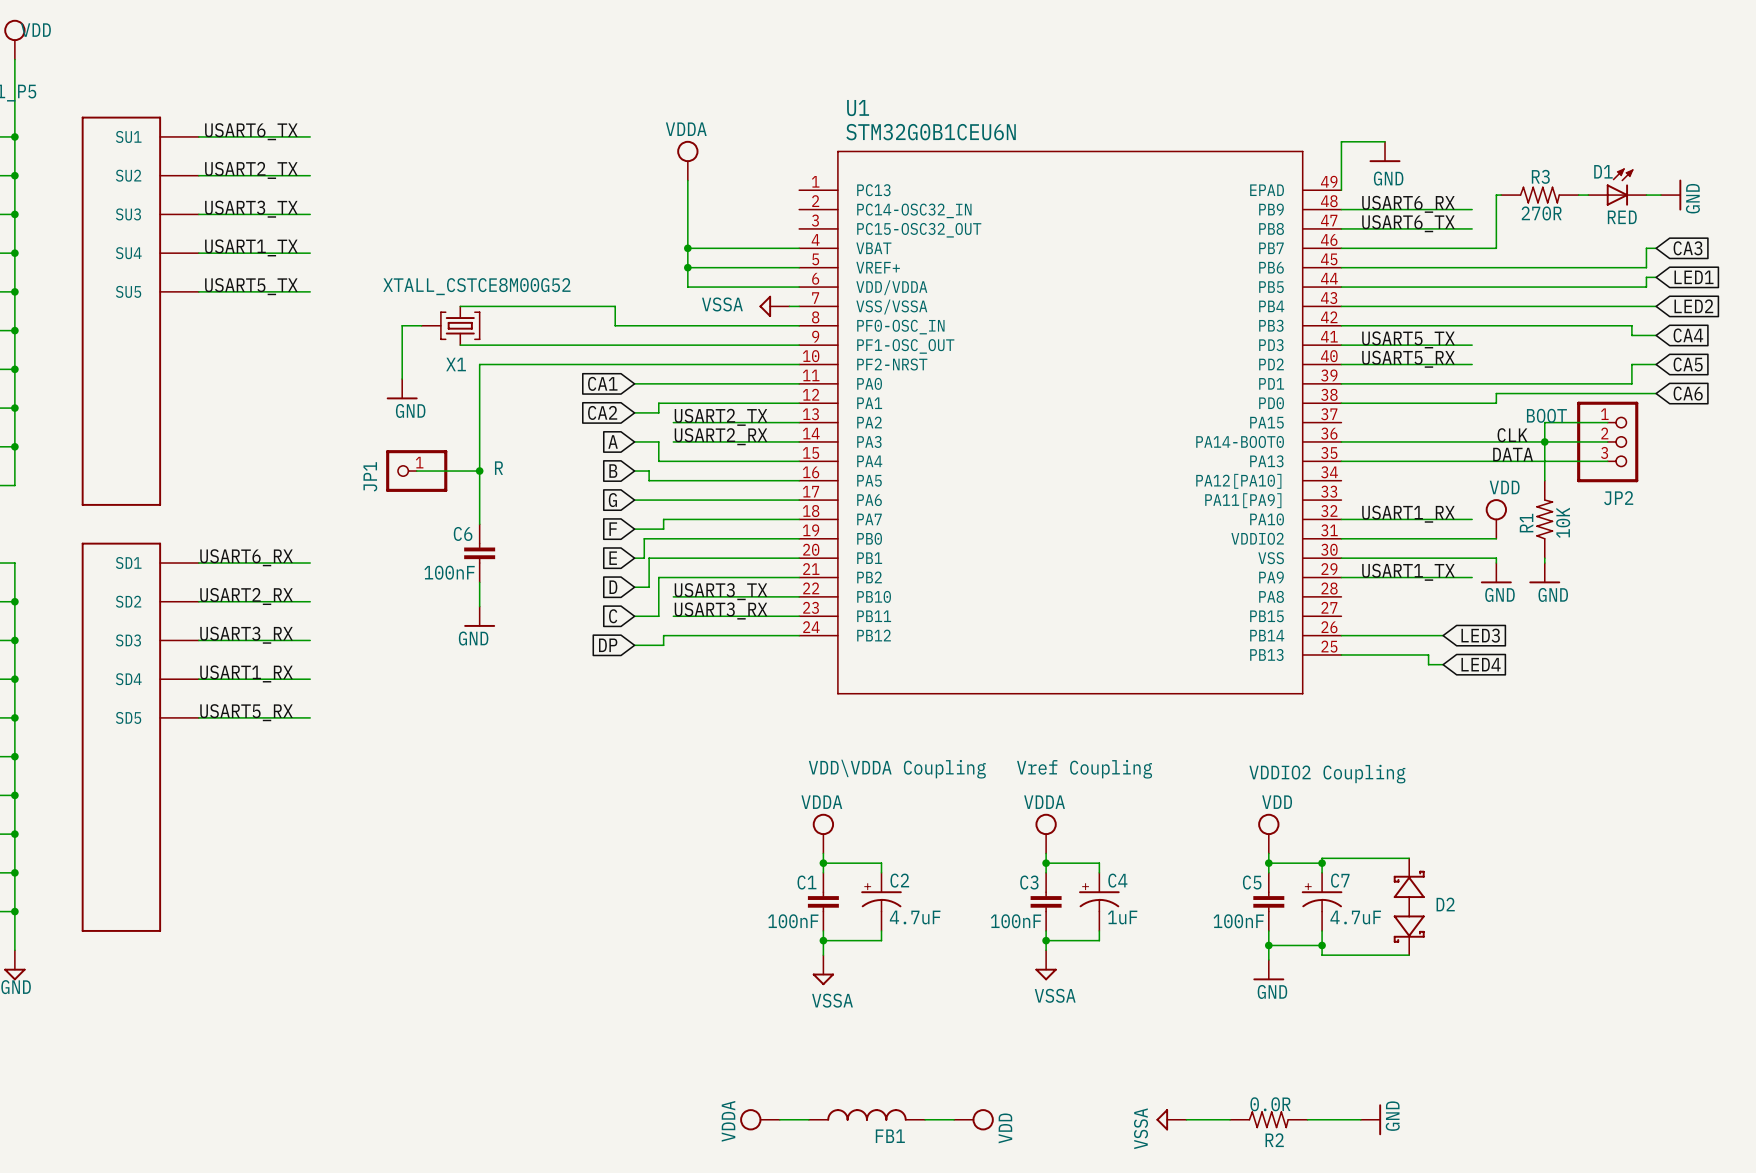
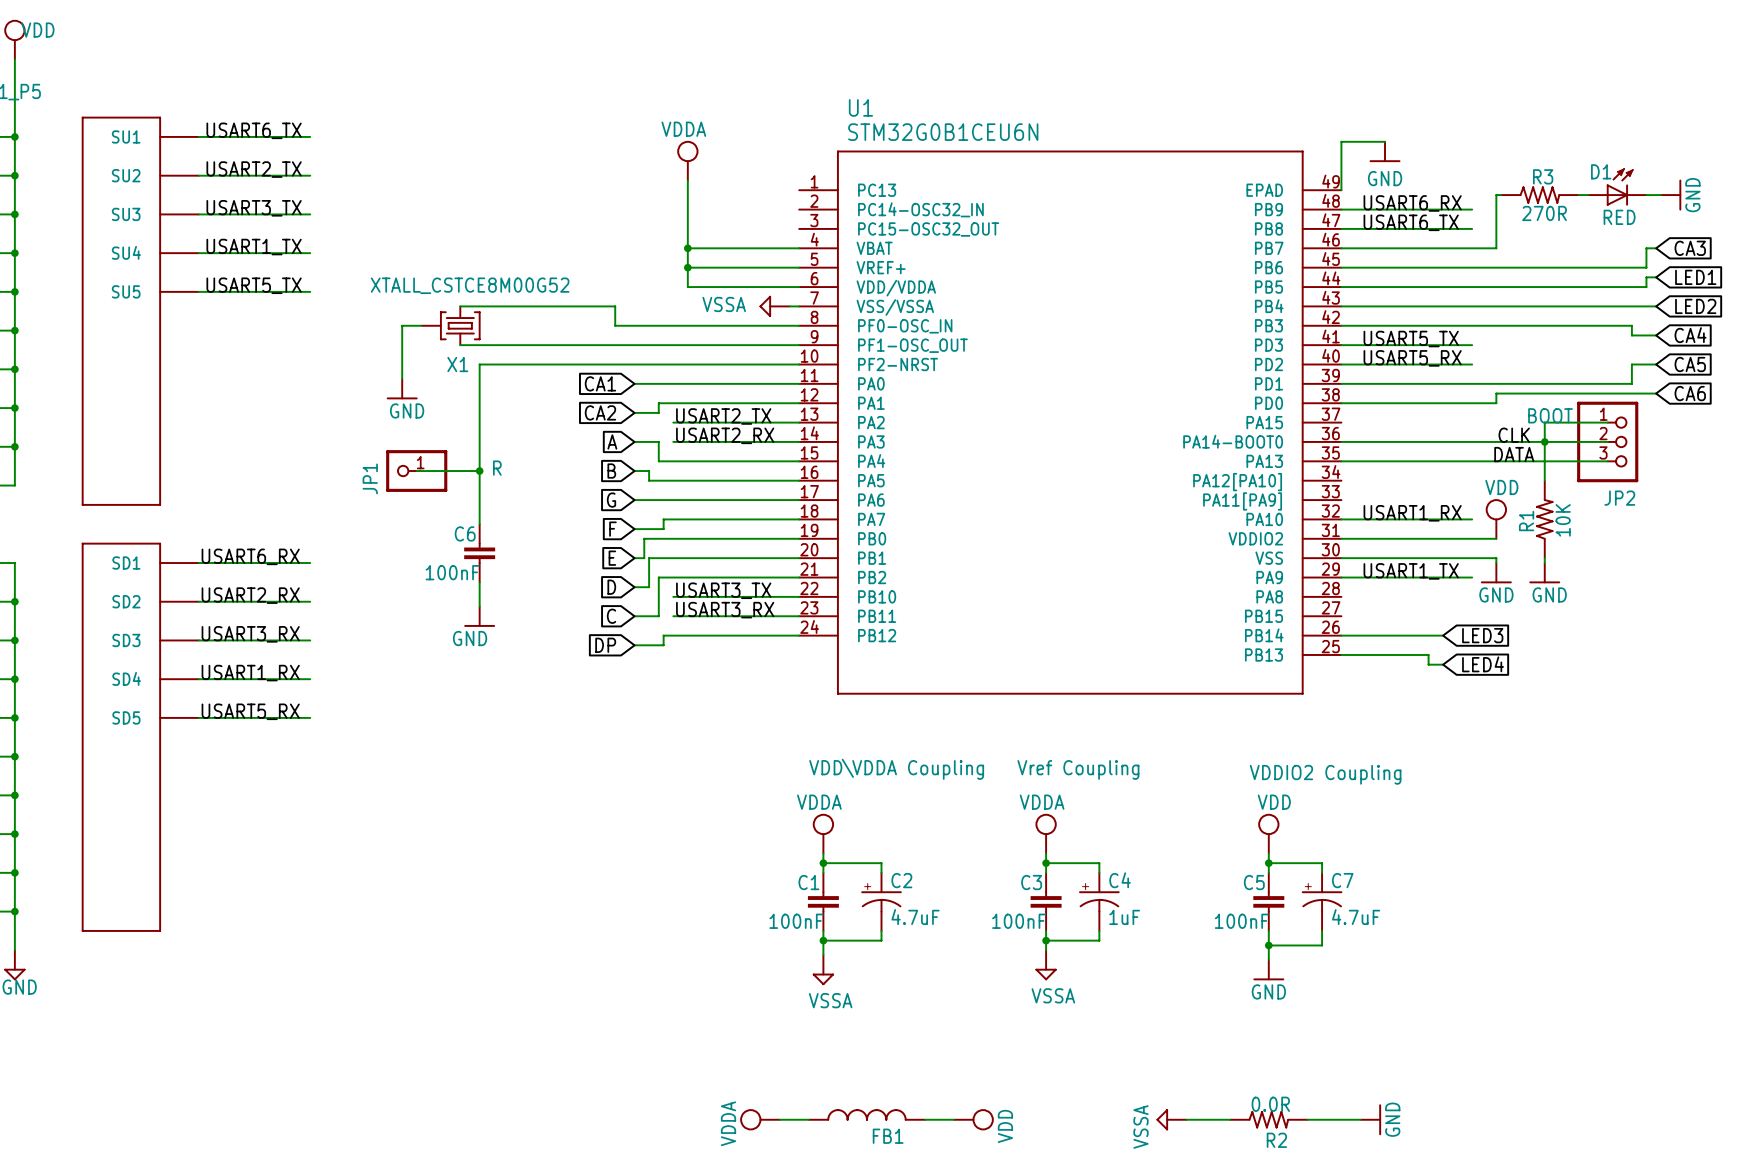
wire: (1409, 858) (1322, 858) (1322, 863) -> none
junction: (1322, 863) -> none
D2: (1409, 906) -> none
wire: (1322, 945) (1322, 955) (1409, 955) -> none
junction: (1322, 945) -> none

